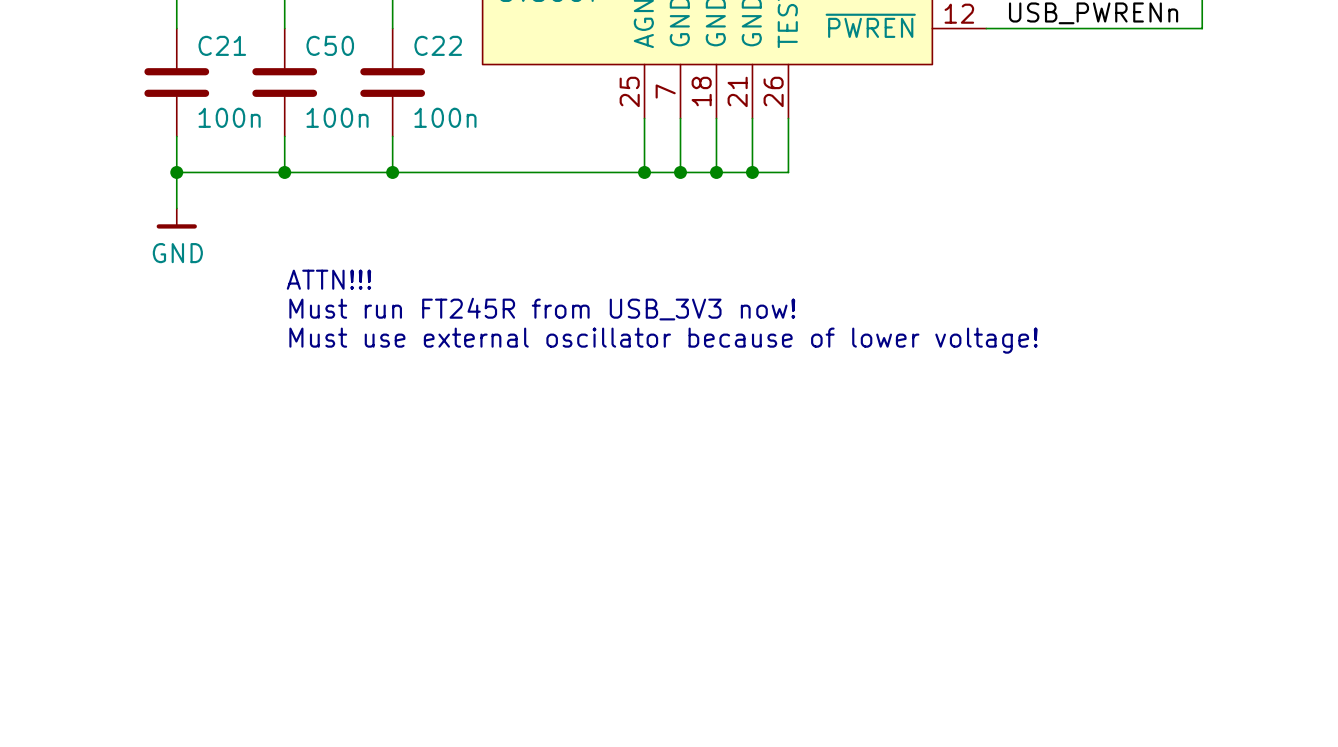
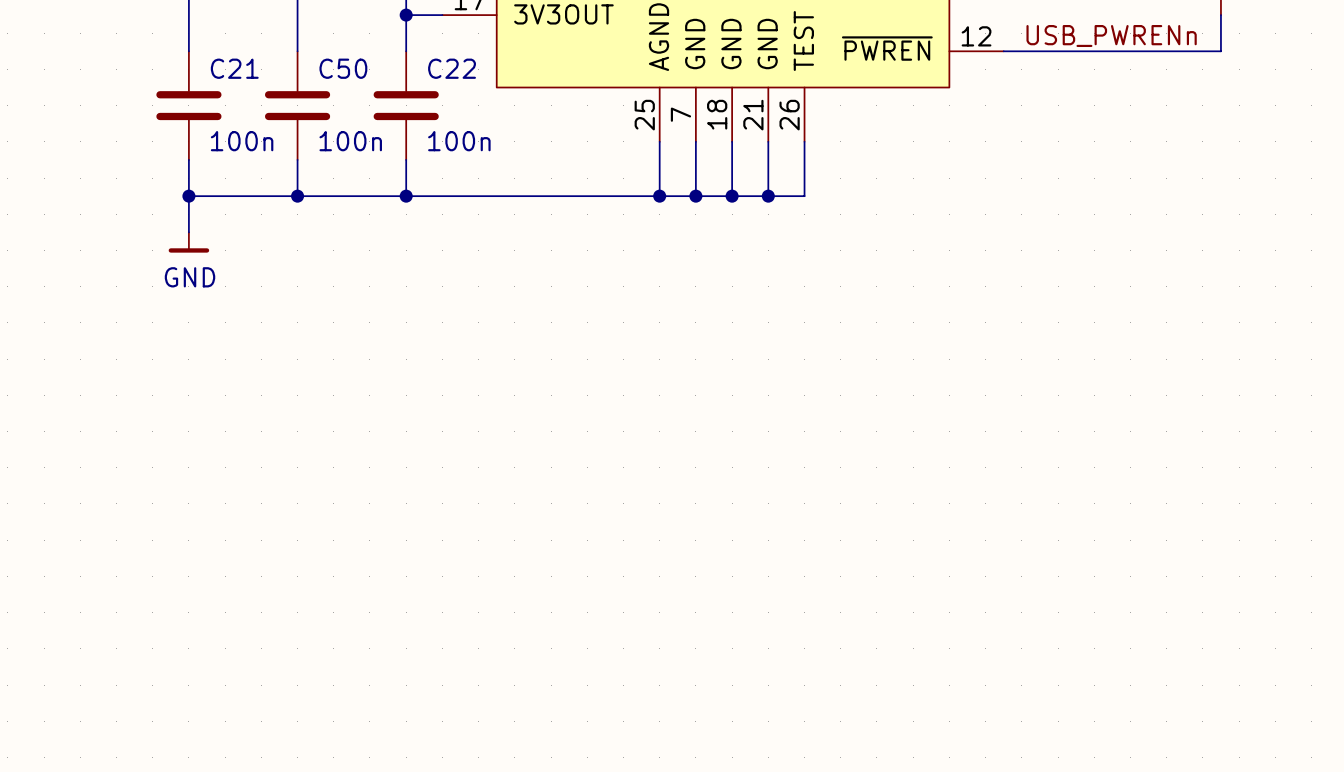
text: ATTN!!! (328, 279) -> none
text: Must run FT245R from USB_3V3 now! (542, 309) -> none
text: Must use external oscillator because of lower voltage! (663, 340) -> none

